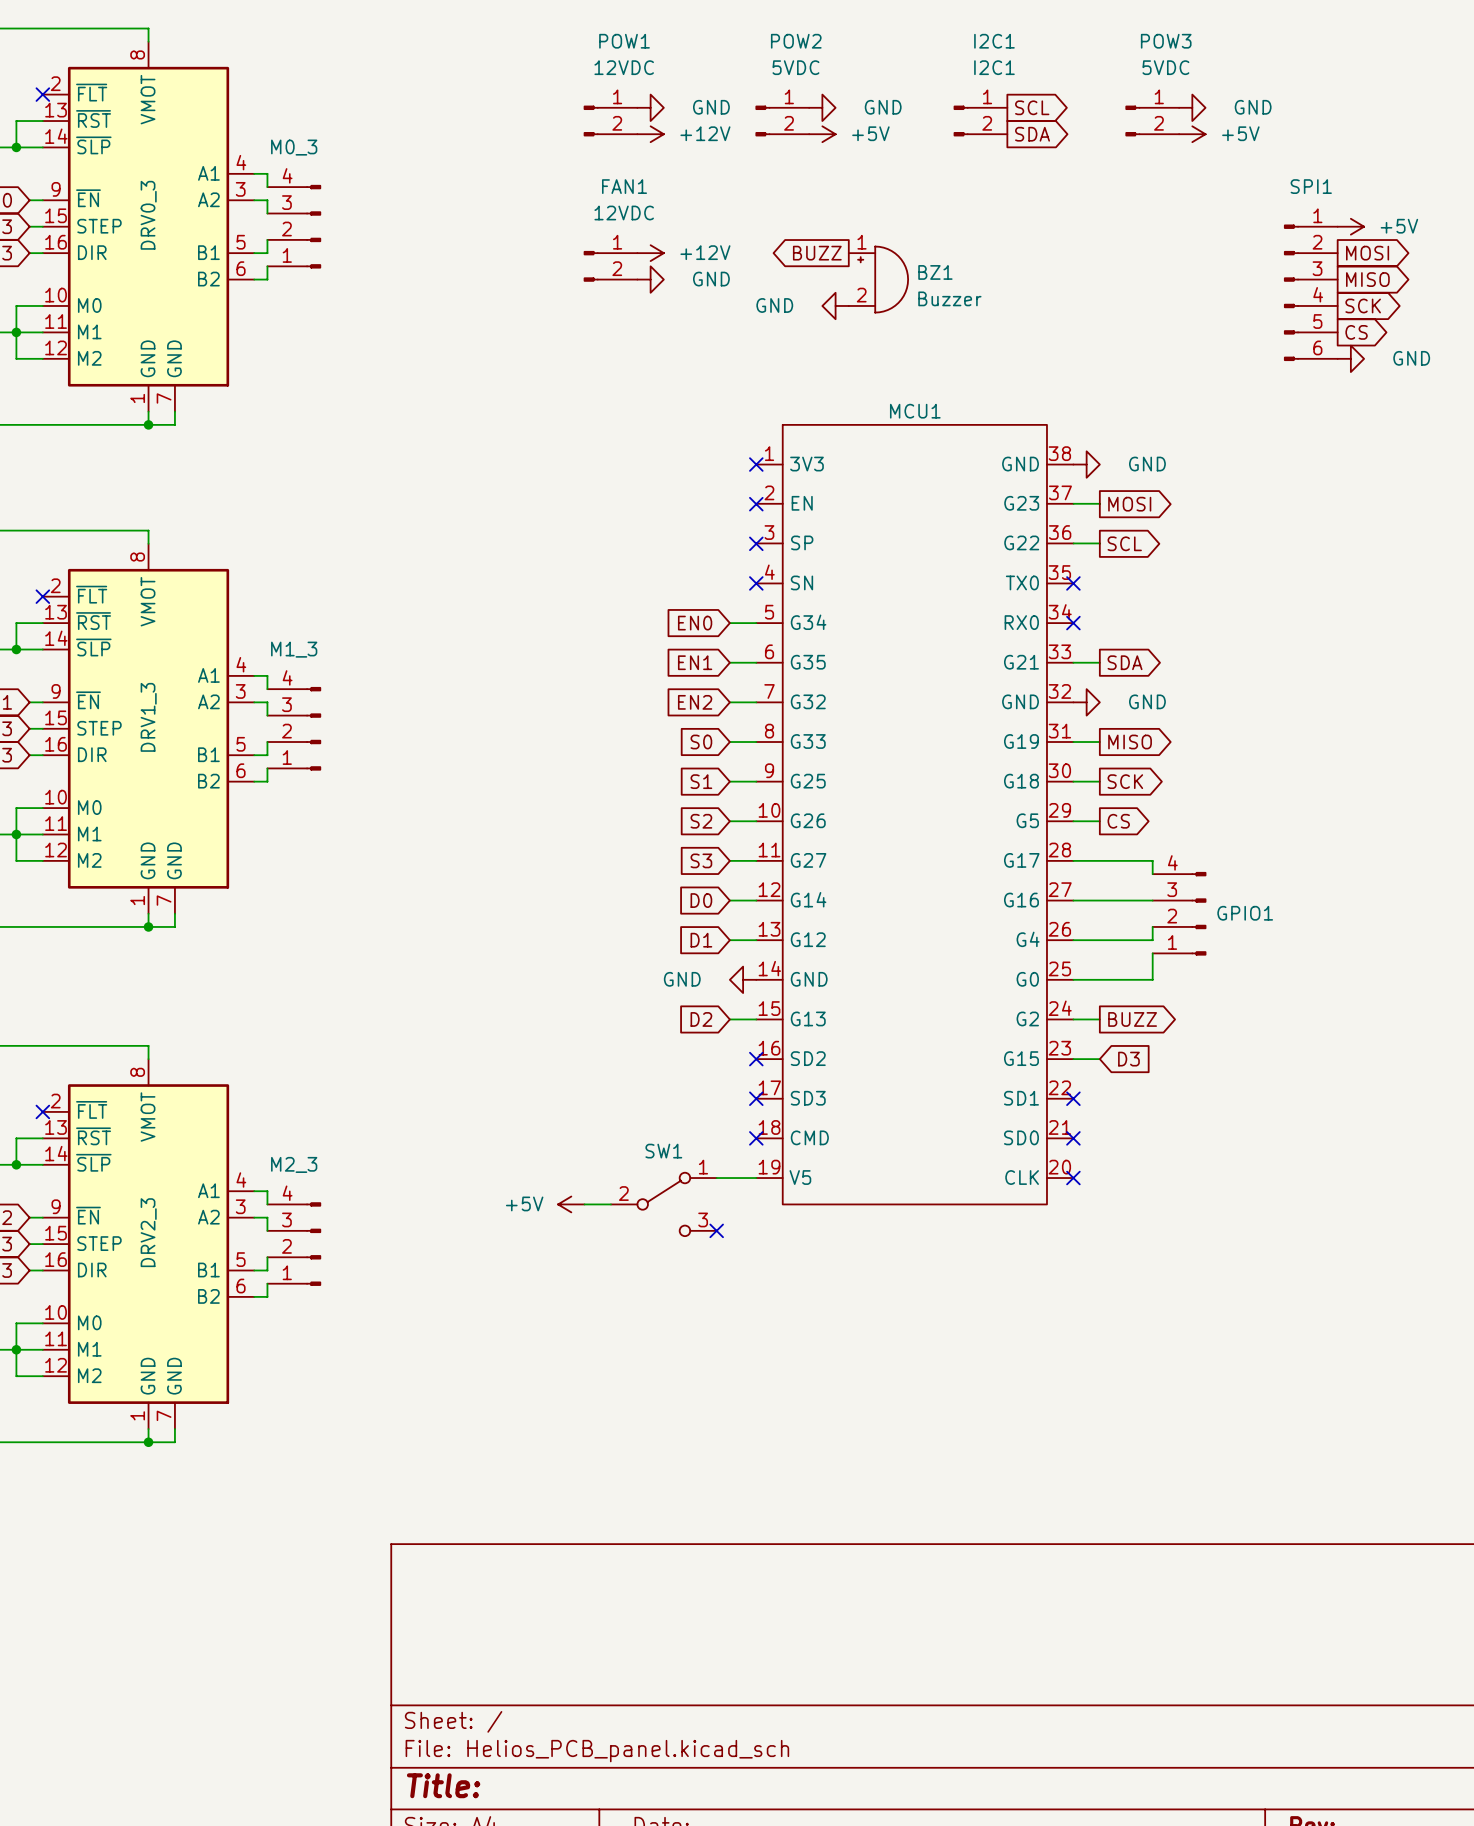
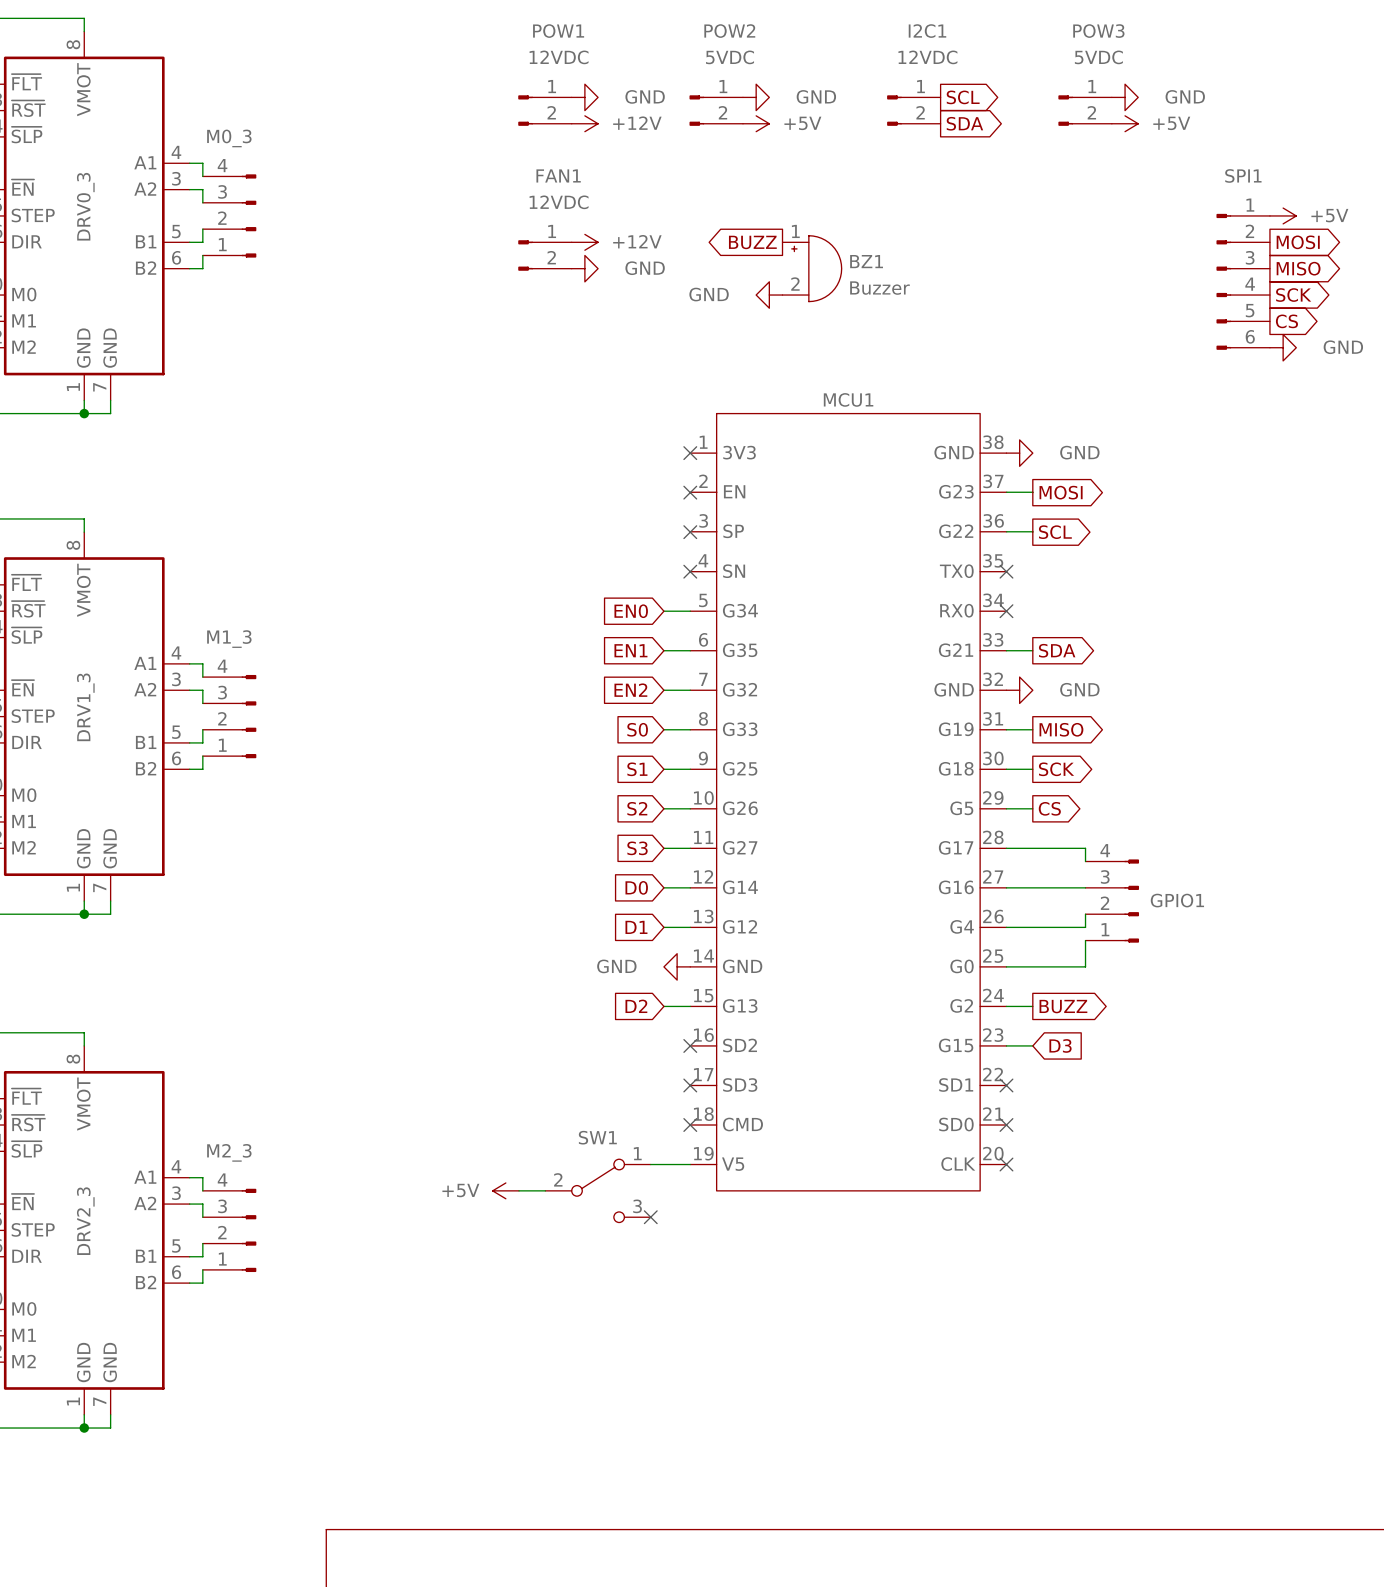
I2C1 value: I2C1 (994, 67) -> 12VDC (927, 57)

